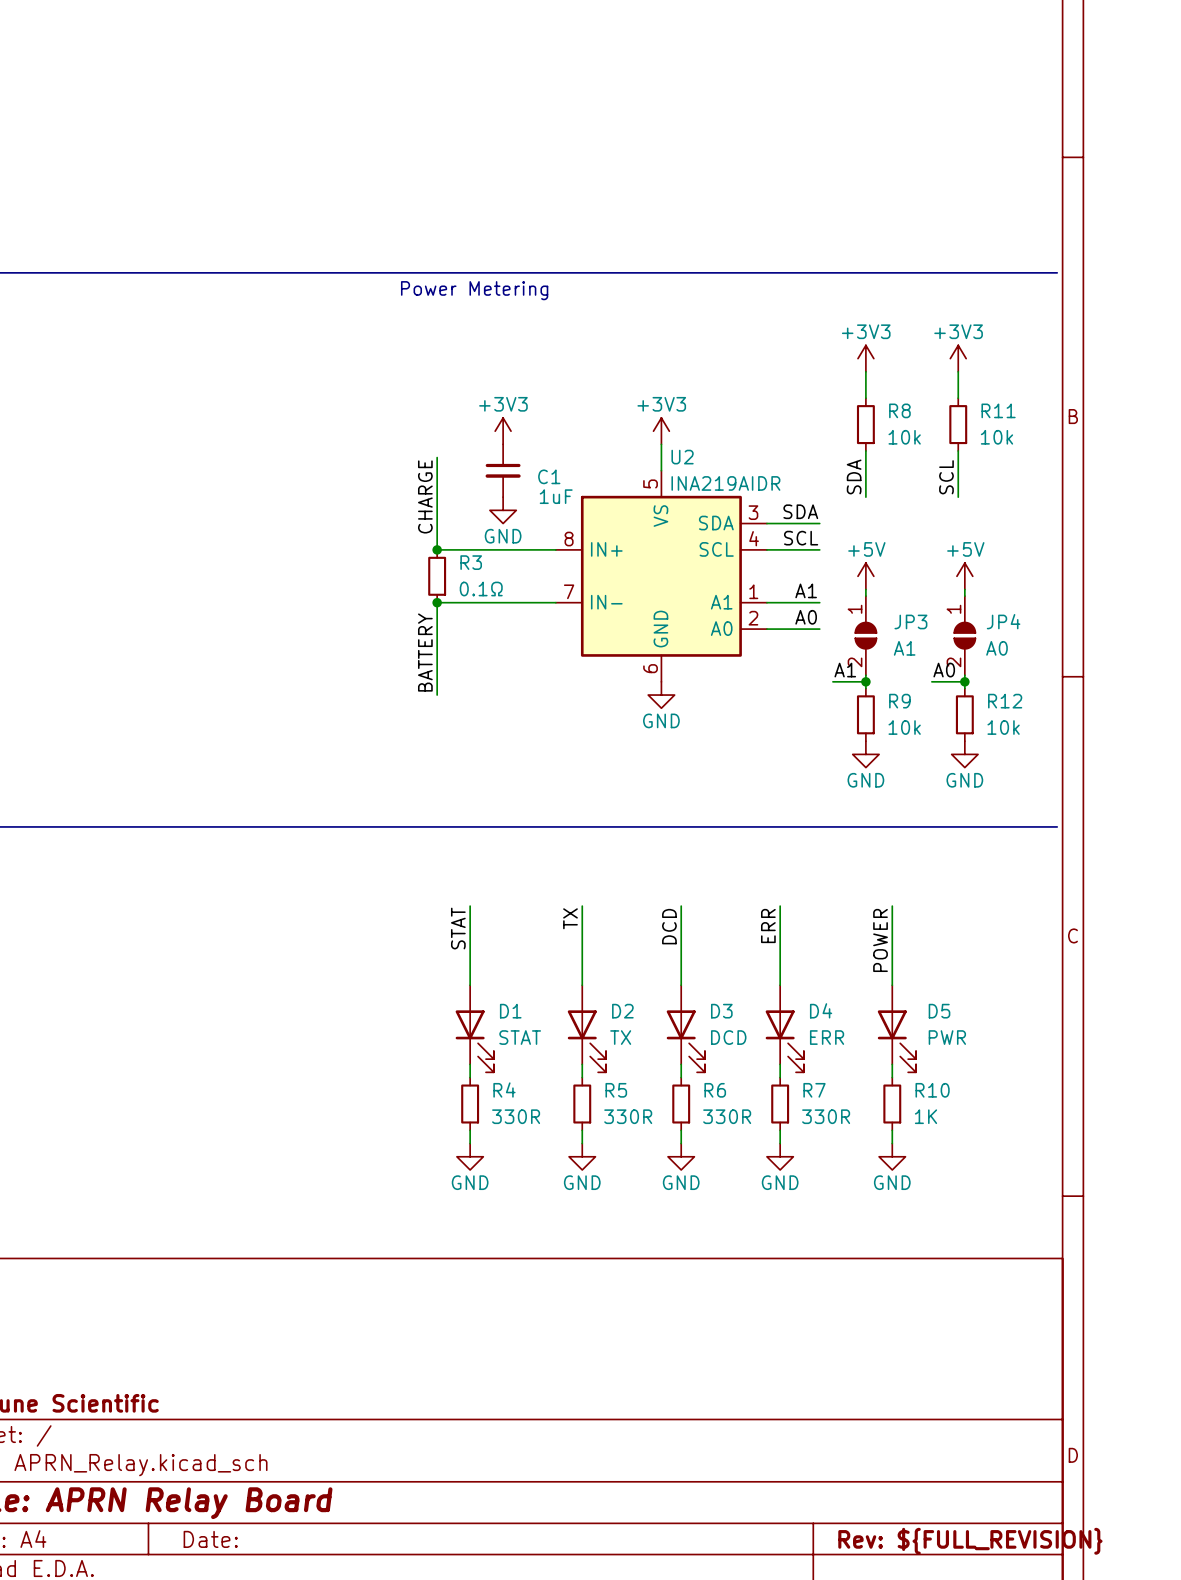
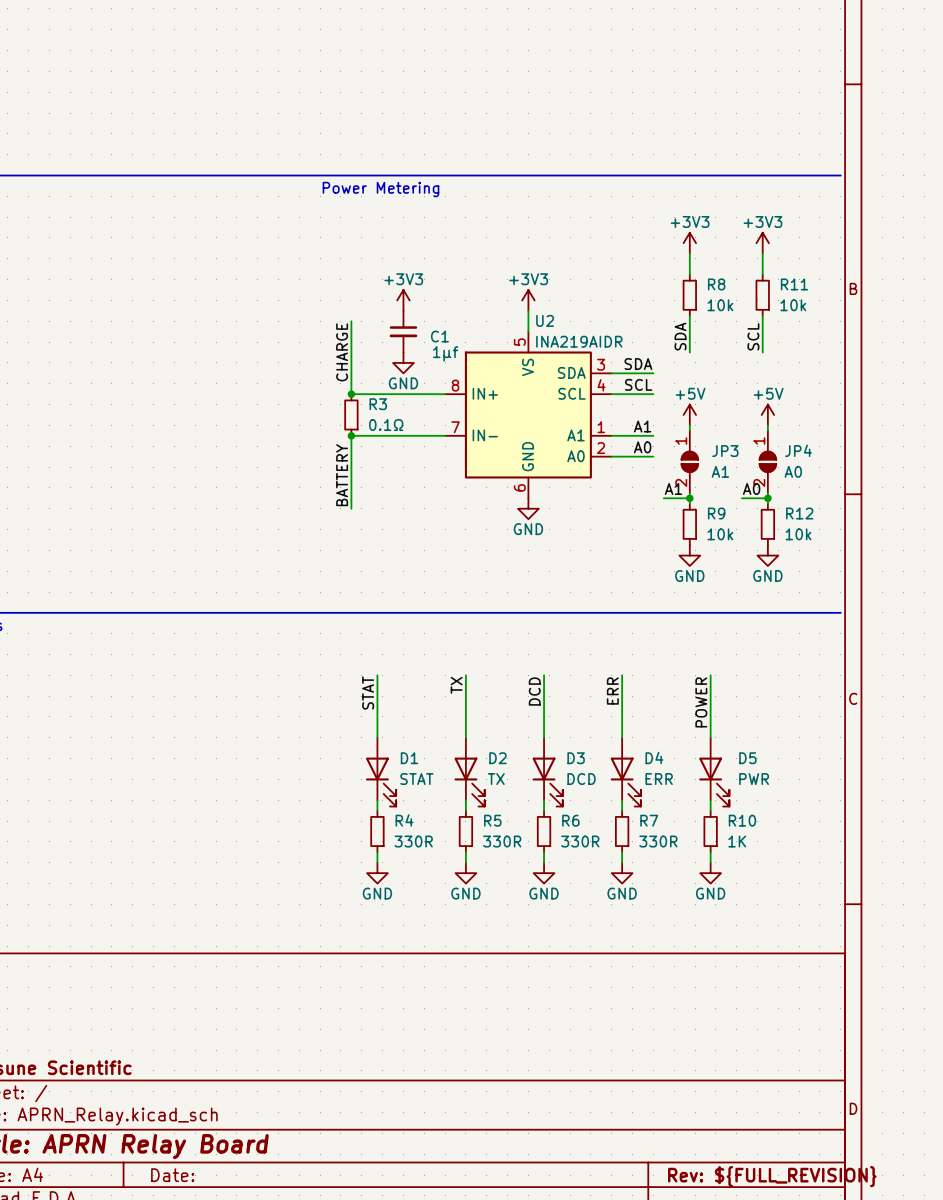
C1 value: 1uF (556, 496) -> 1μf (445, 353)

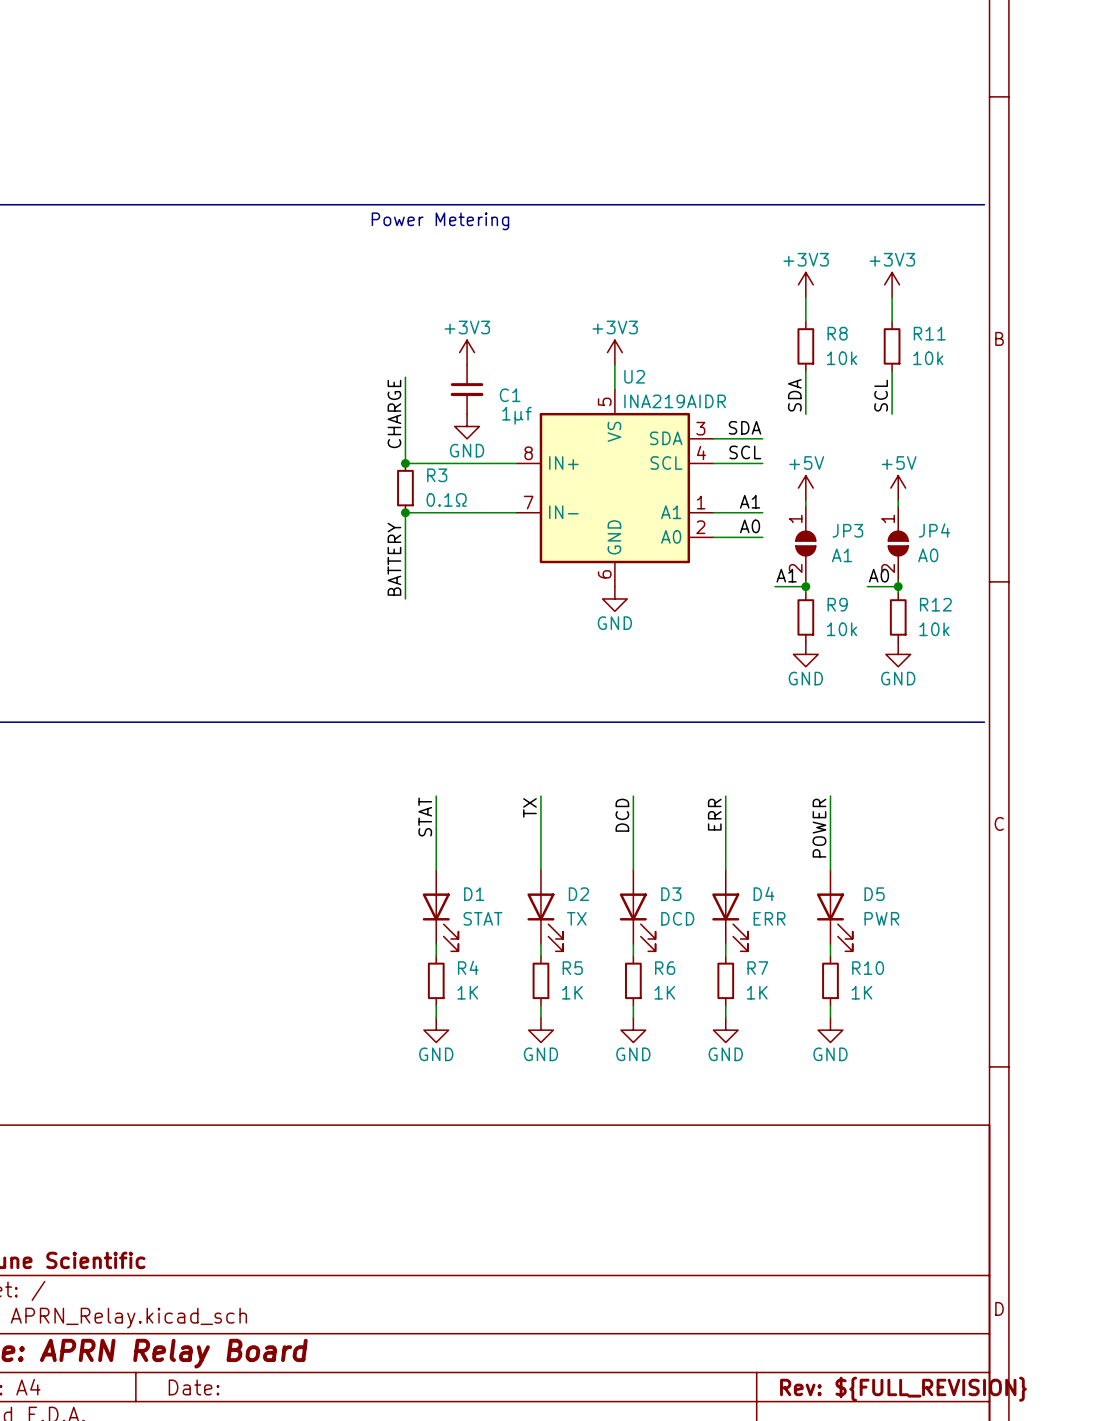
R4 value: 330R (413, 841) -> 1K (467, 992)
R5 value: 330R (502, 841) -> 1K (572, 992)
R6 value: 330R (580, 841) -> 1K (664, 992)
R7 value: 330R (658, 841) -> 1K (757, 992)

